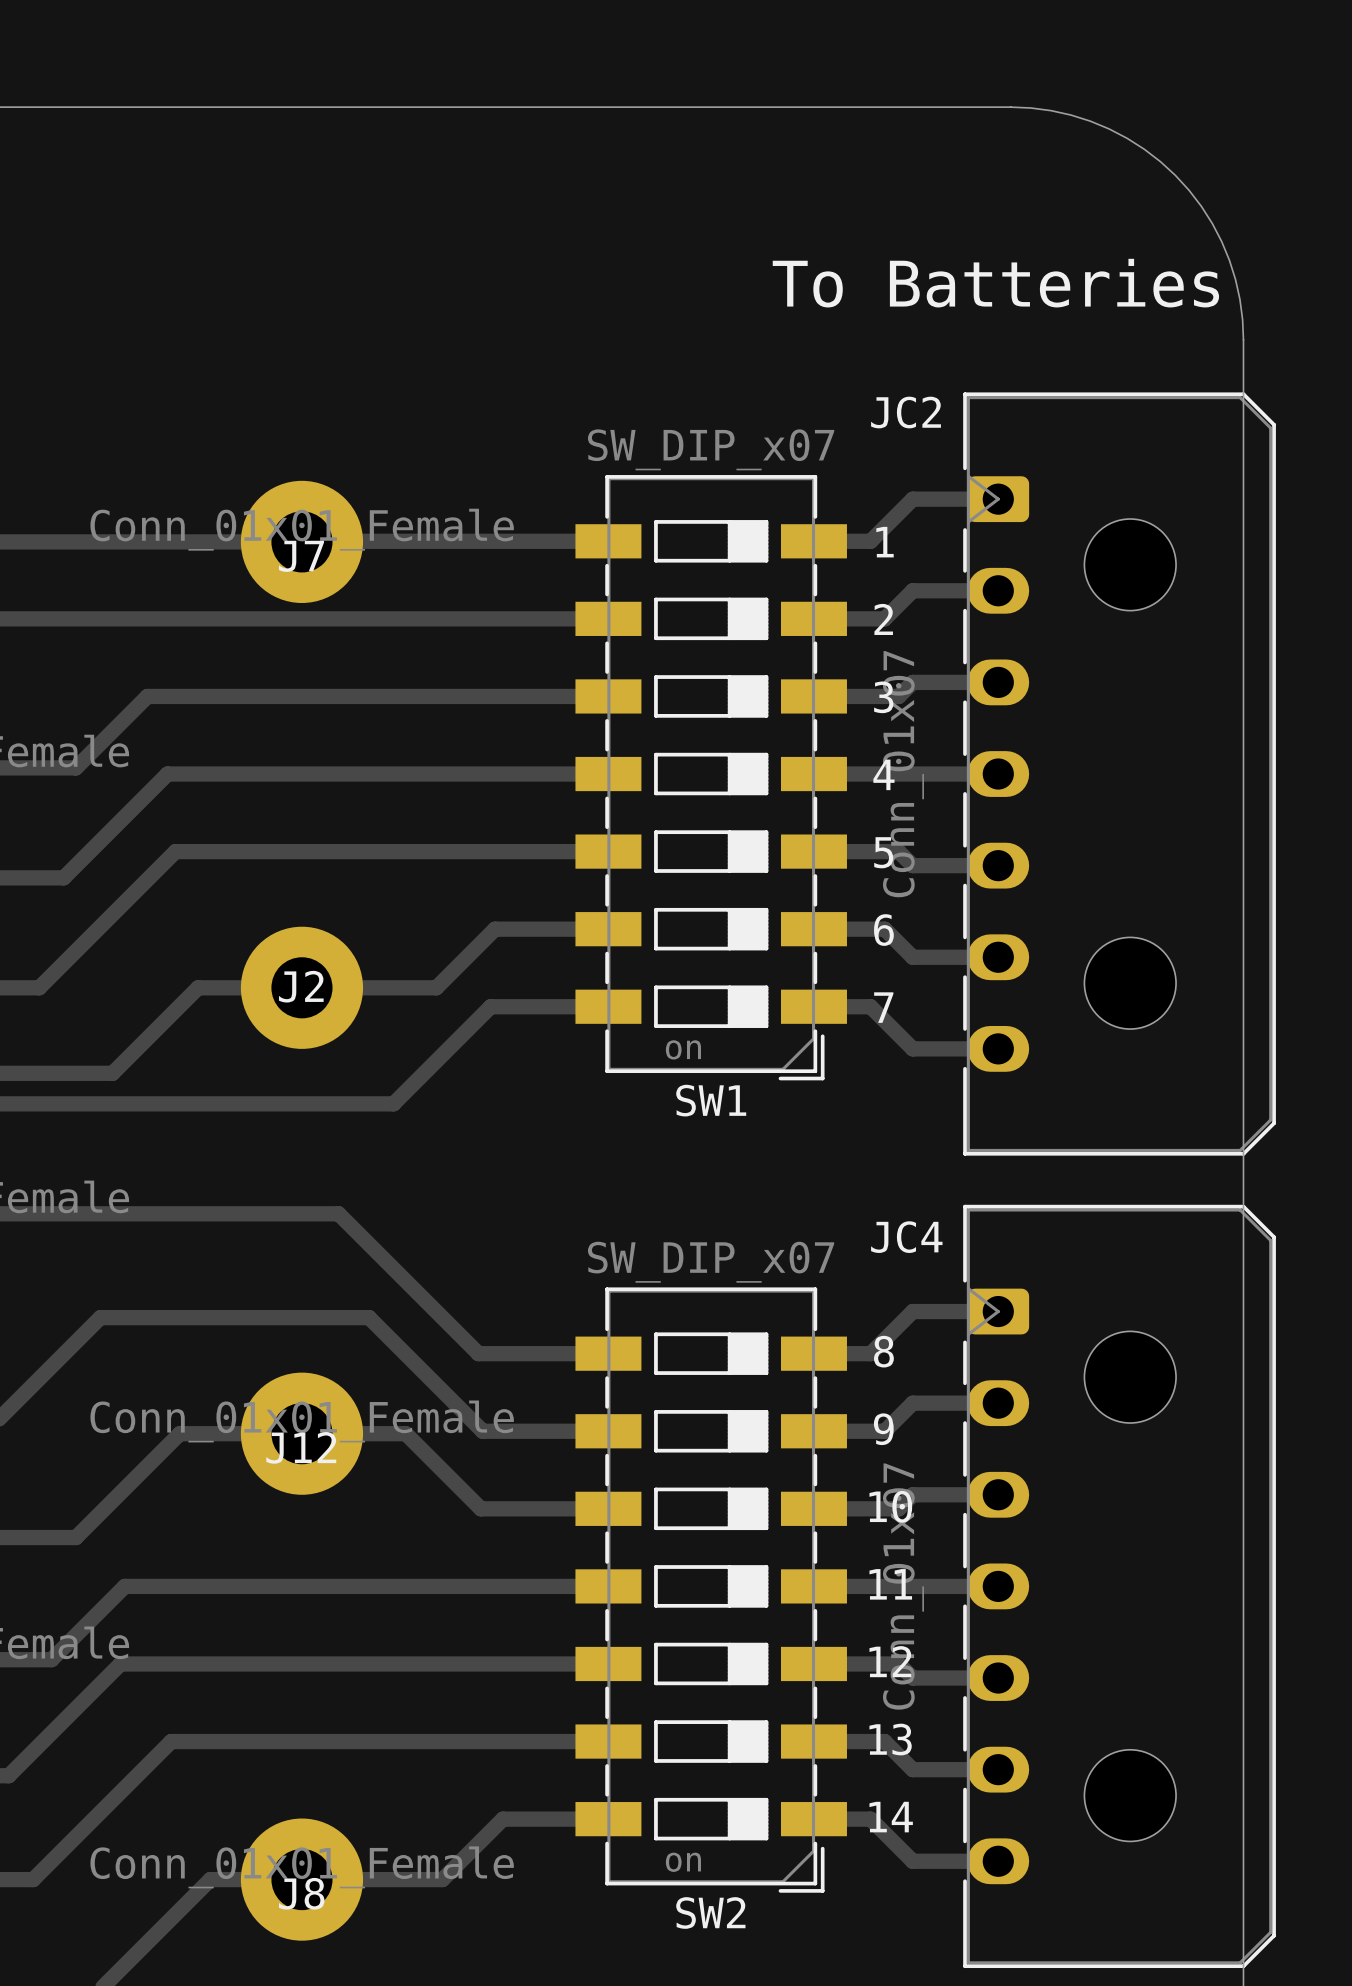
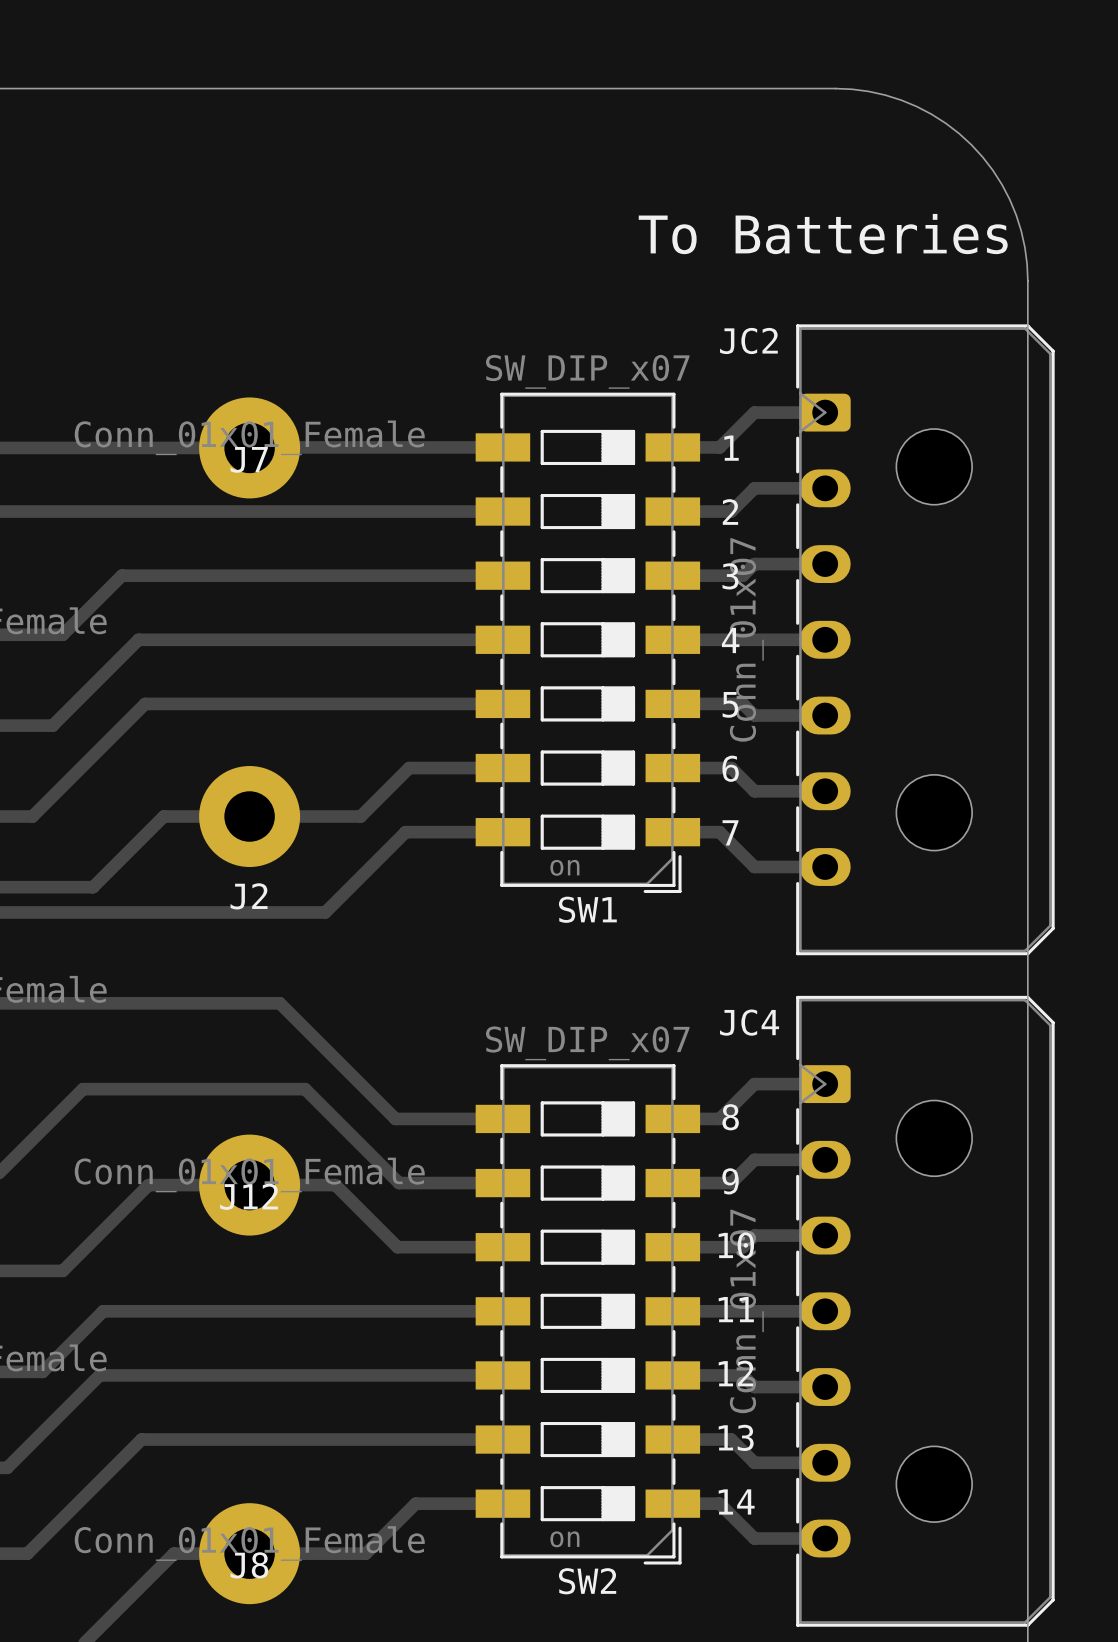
J2 name position: J2 (301, 986) -> J2 (249, 896)

